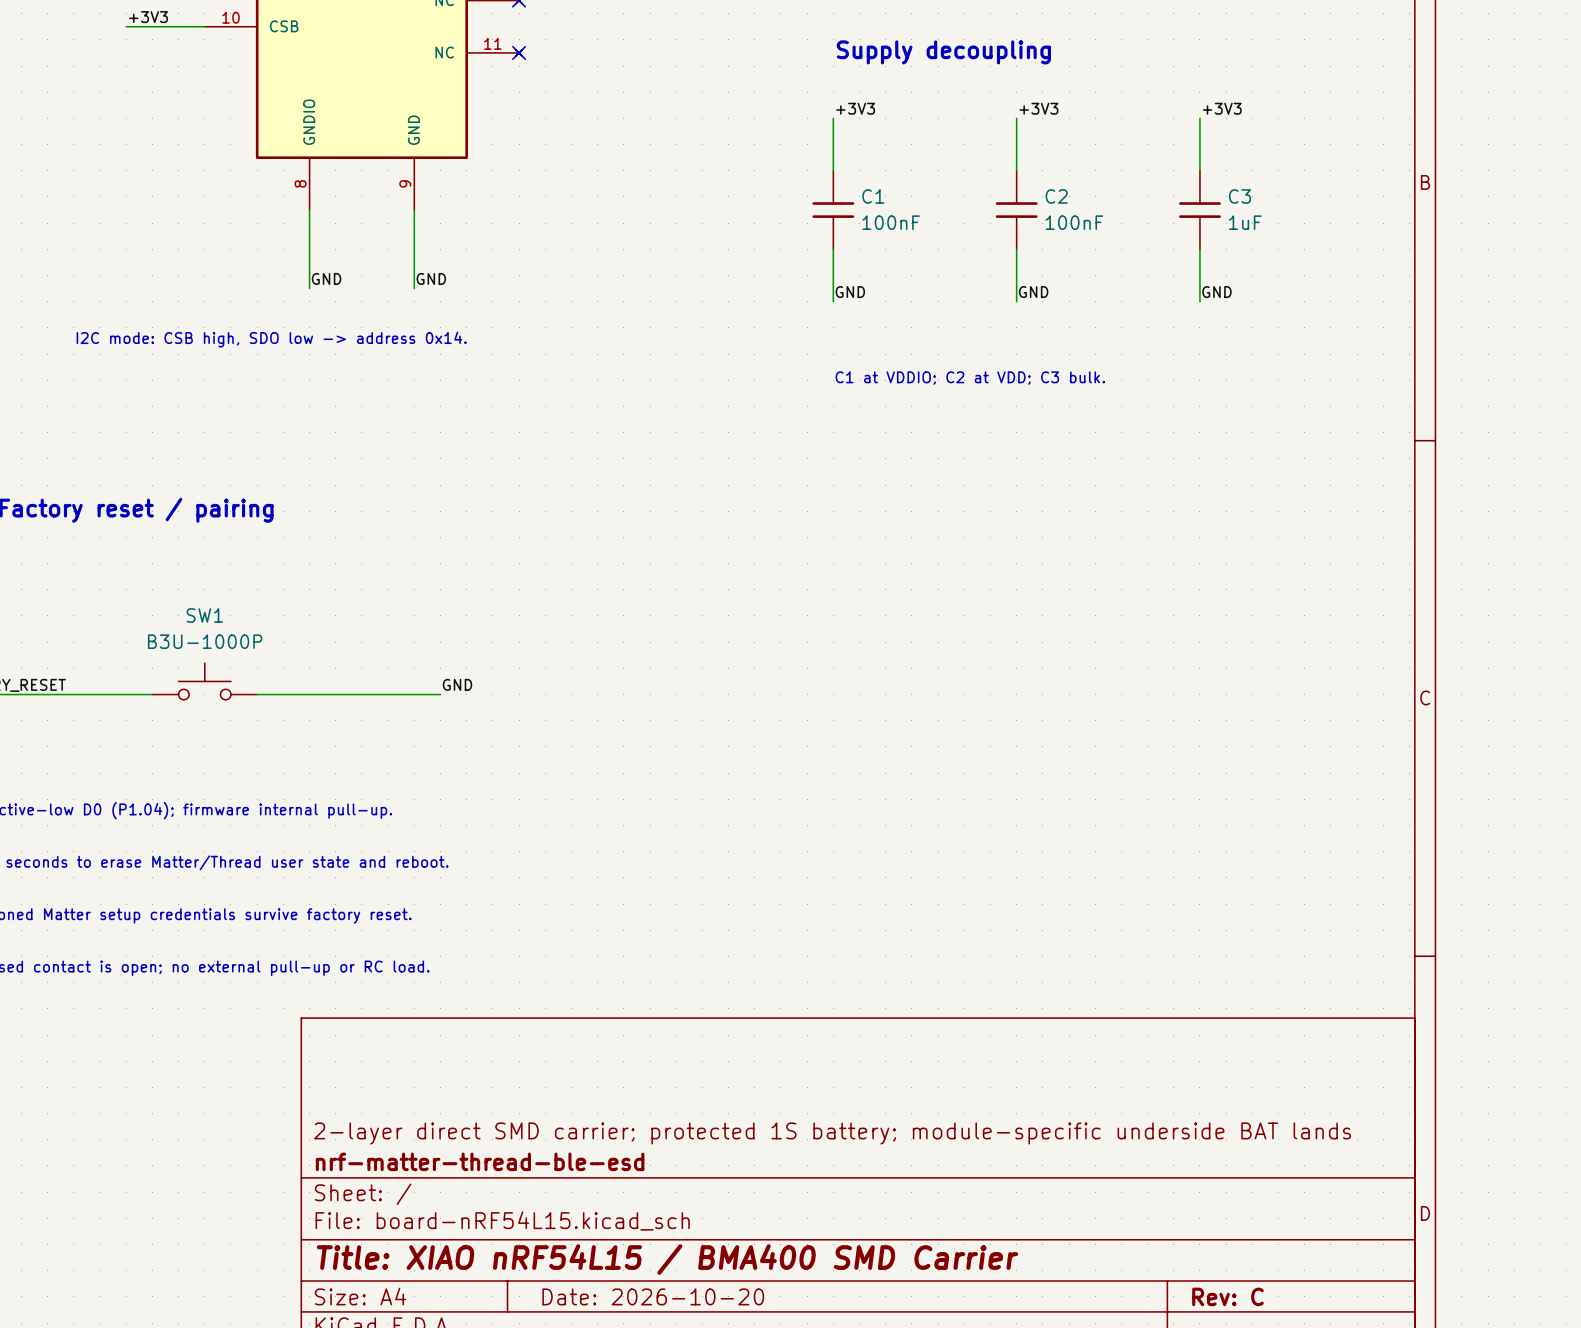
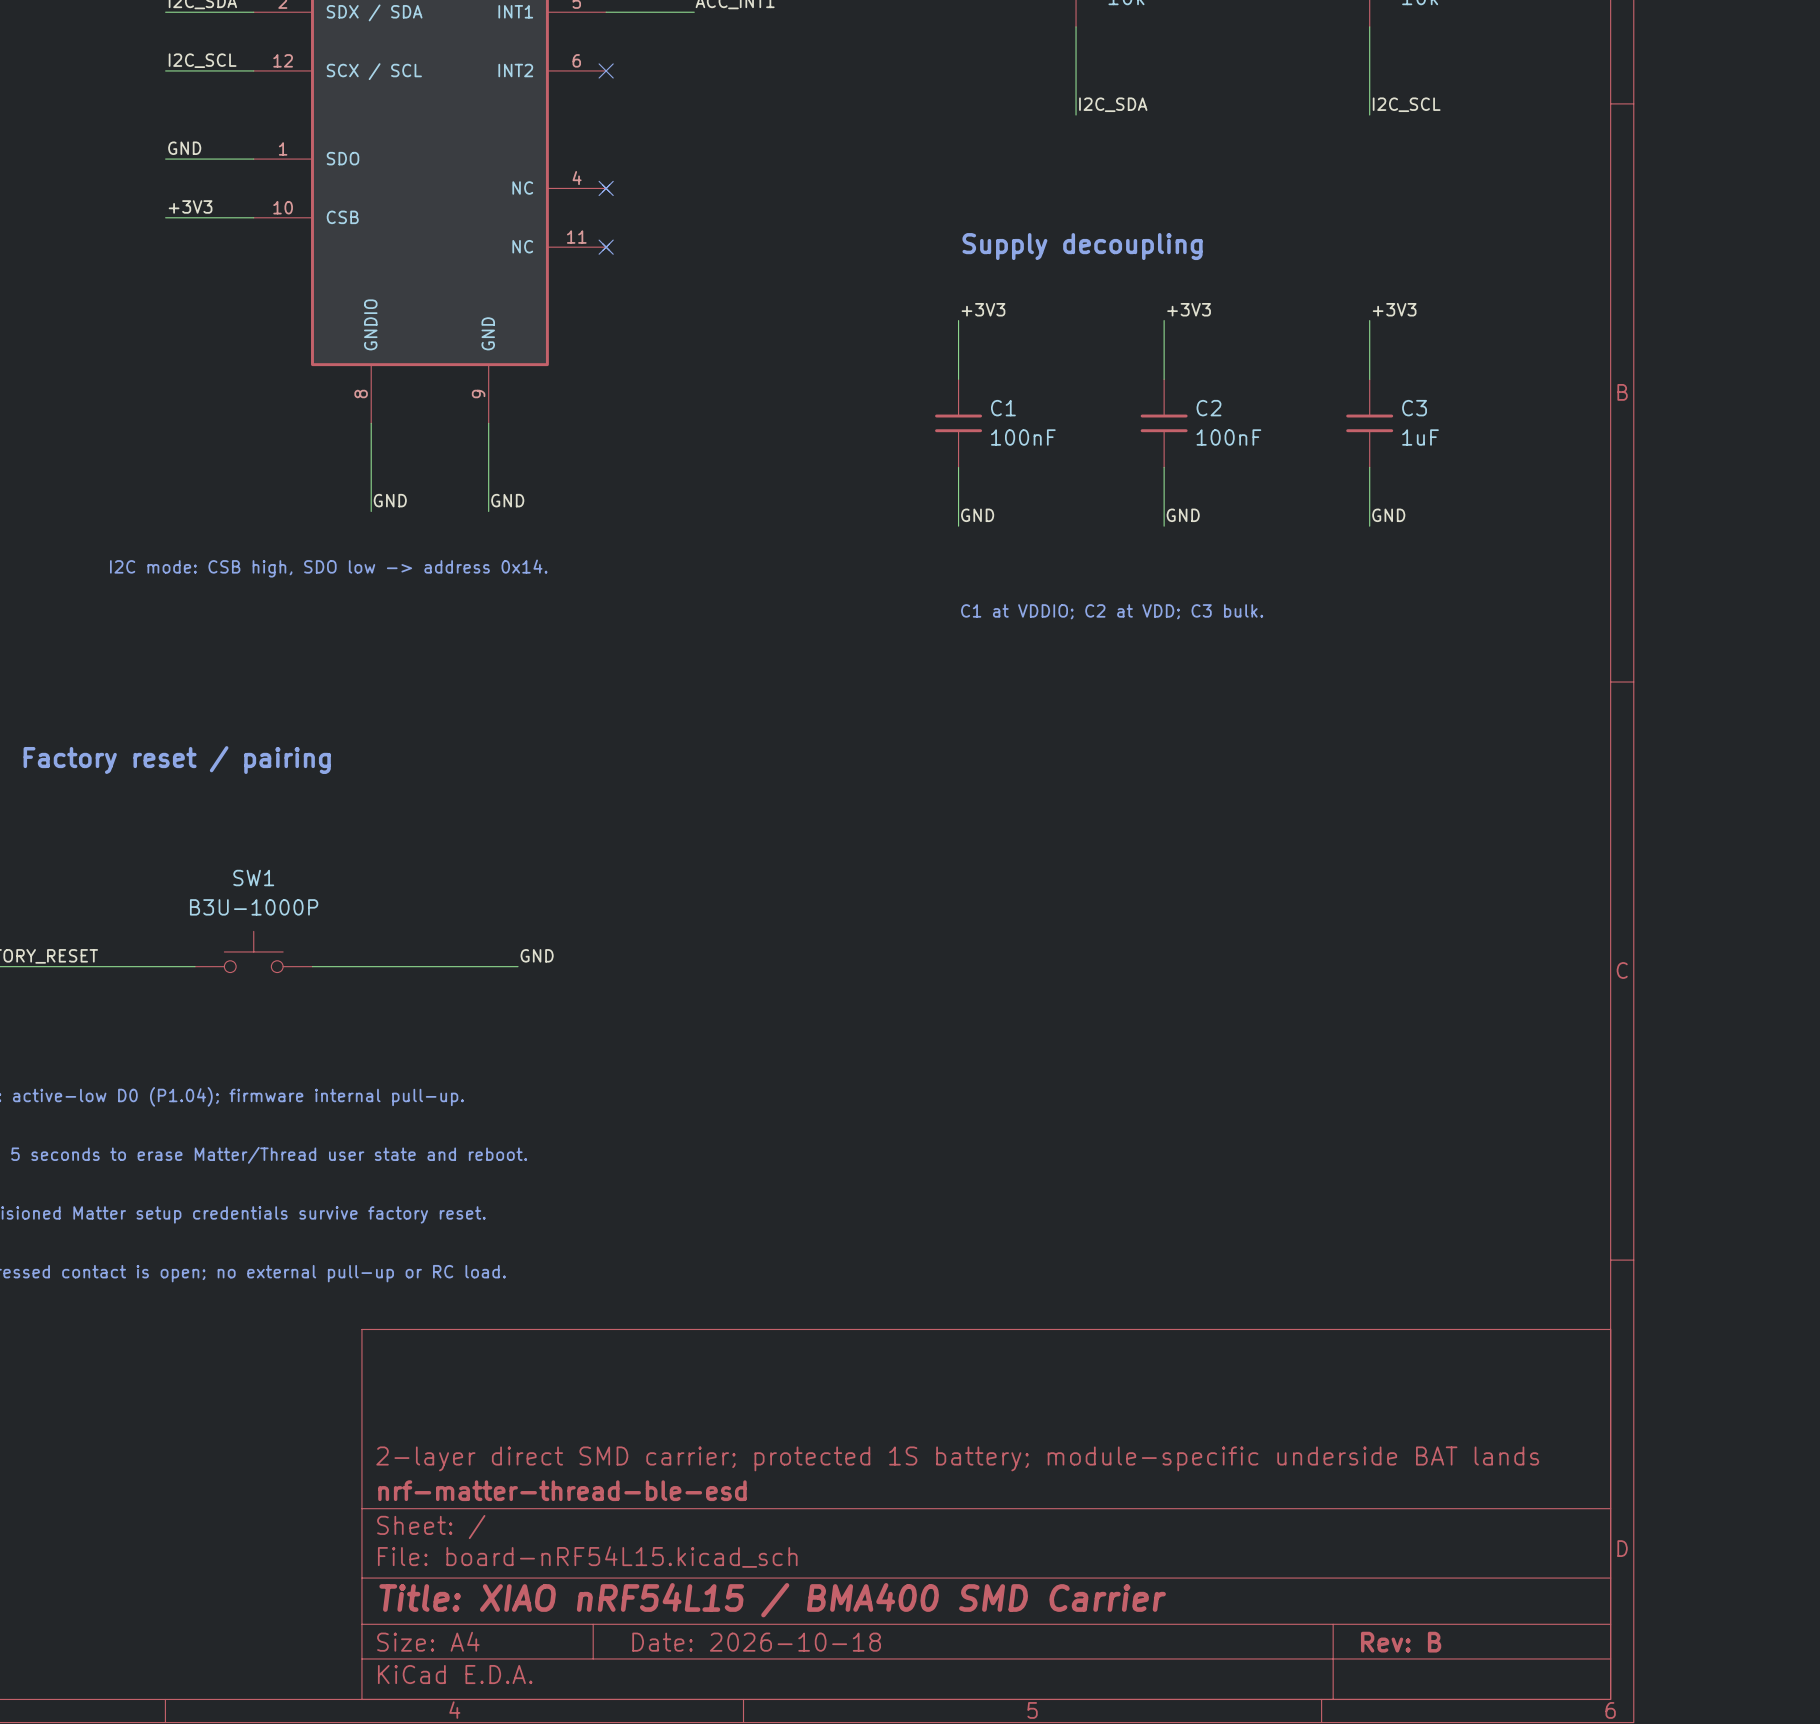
title block: Date: 2026-10-20 (653, 1296) -> Date: 2026-10-18 (756, 1642)
title block: Rev: C (1227, 1296) -> Rev: B (1401, 1642)

